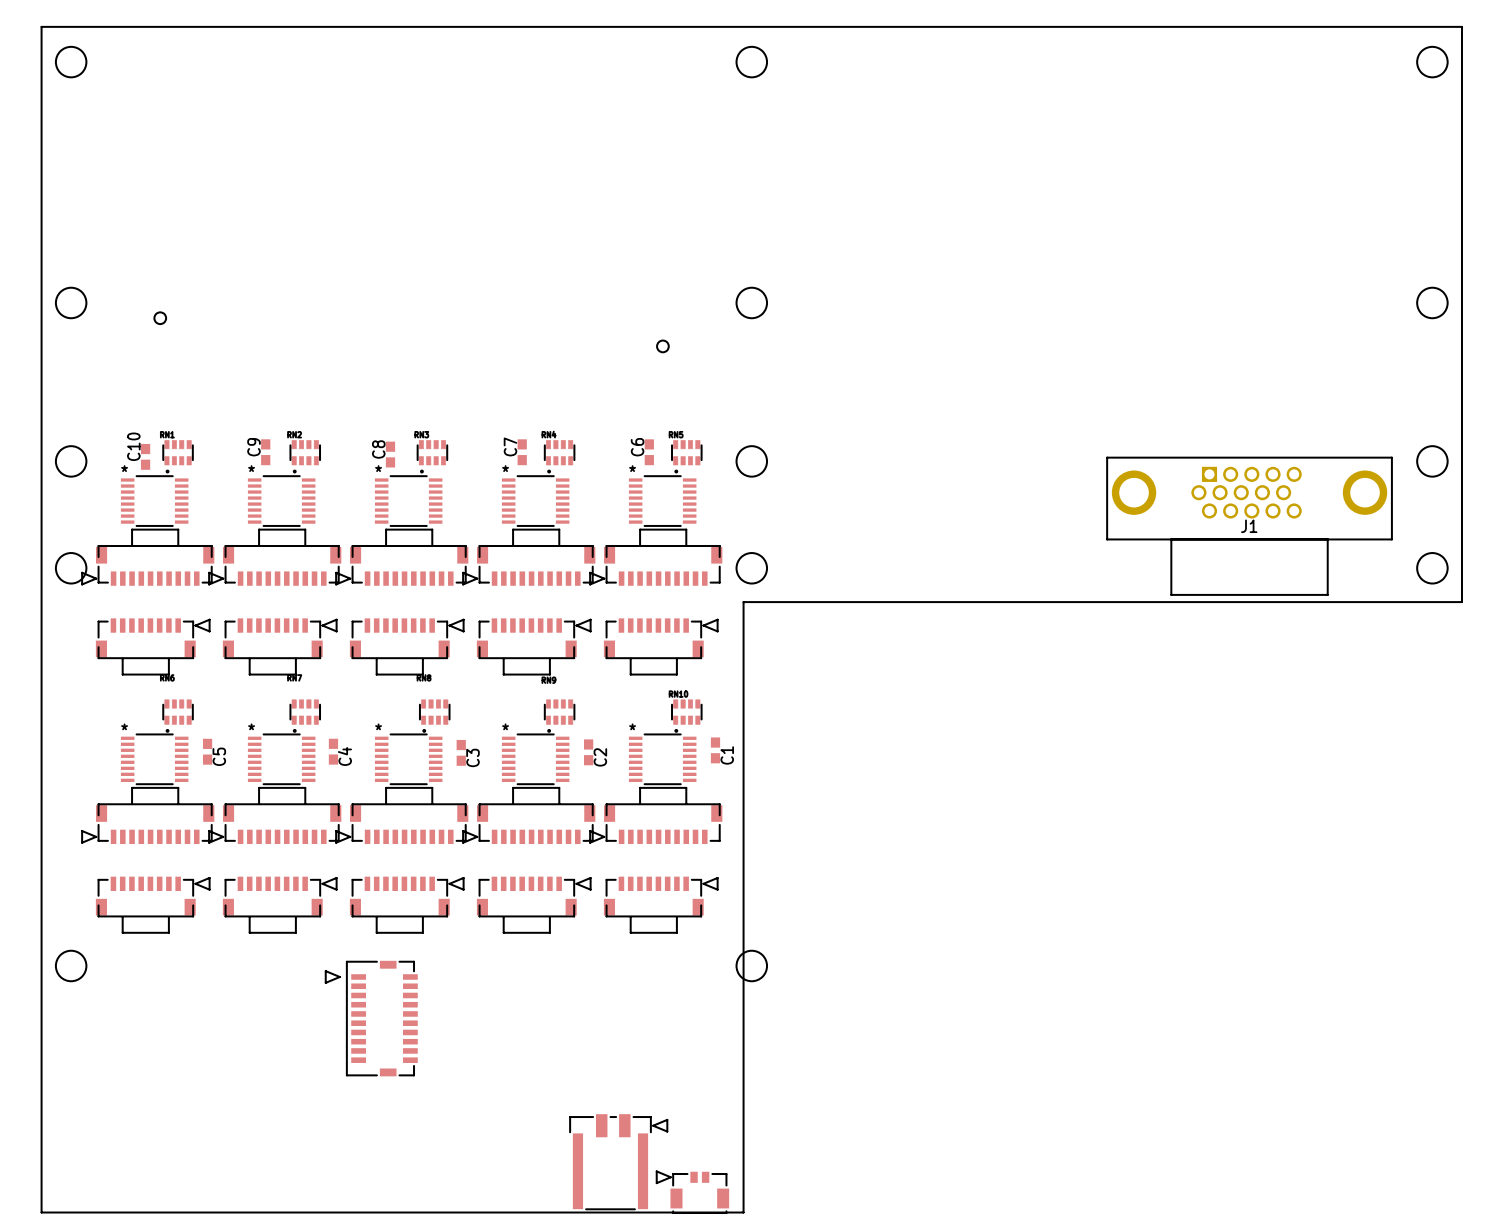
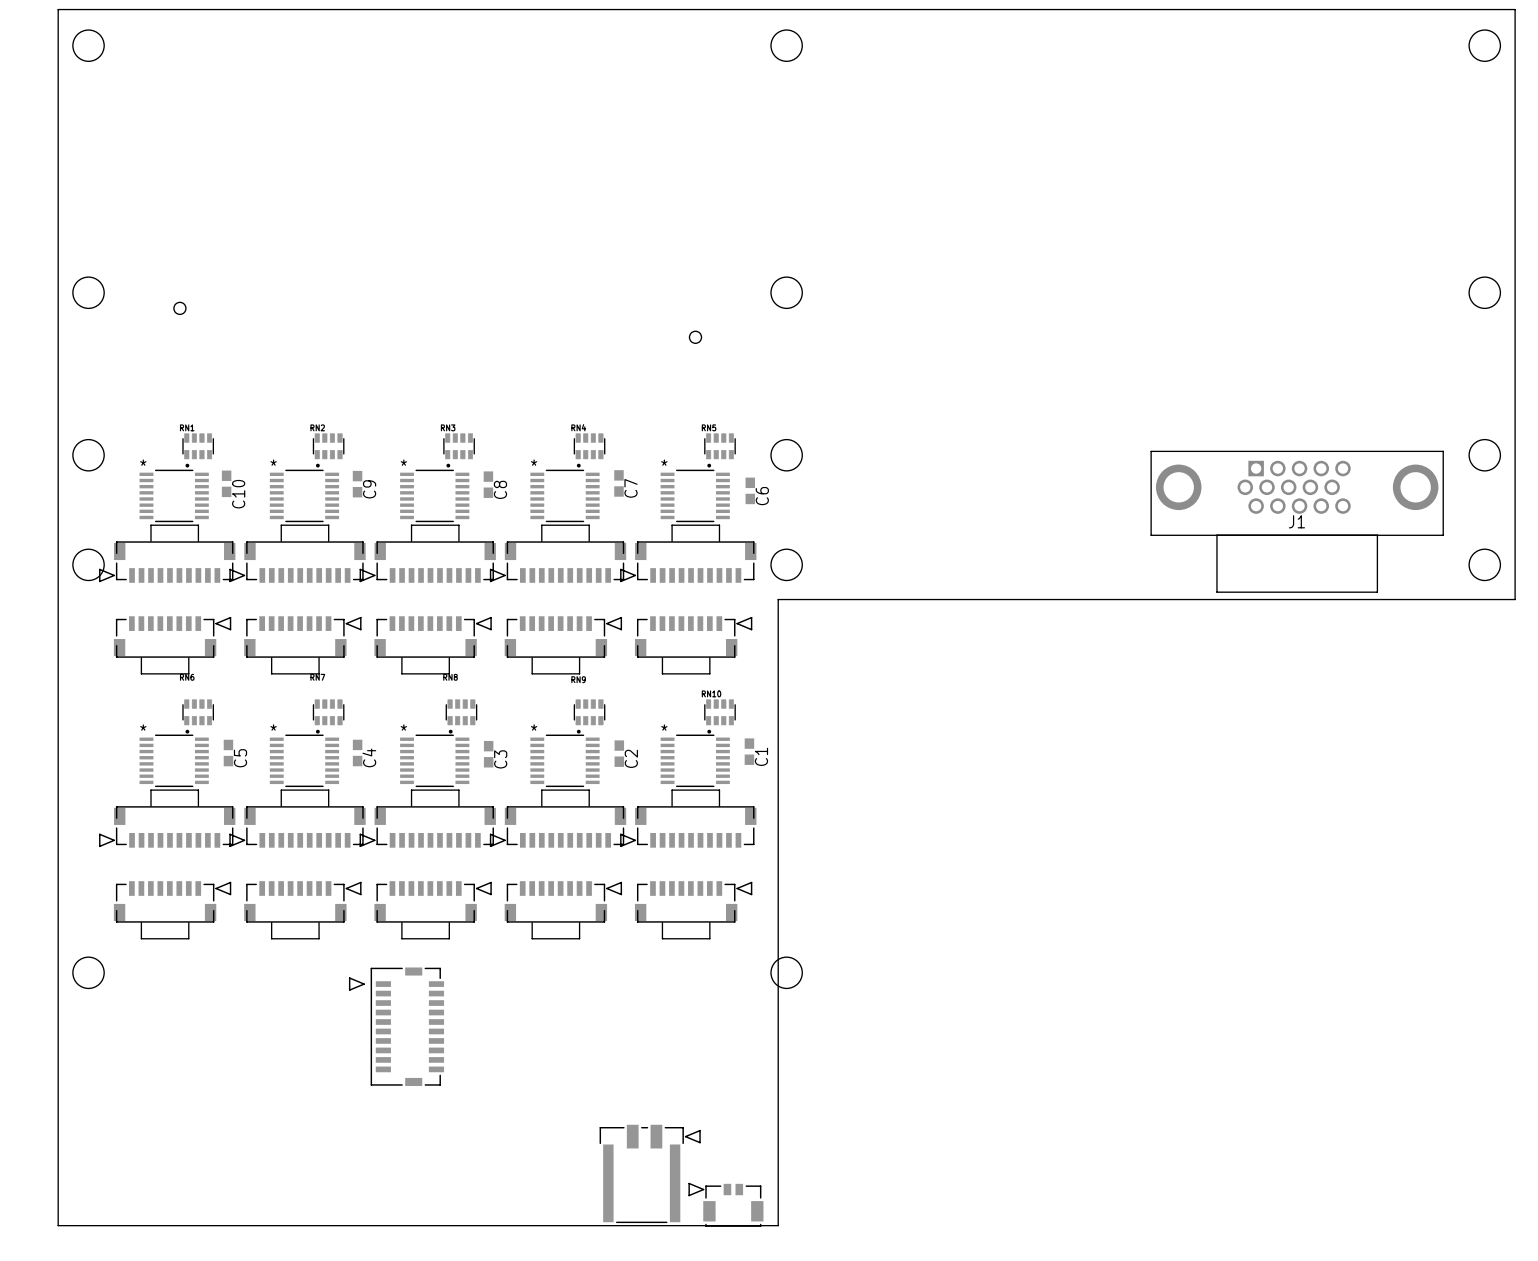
C10 name position: C10 (133, 446) -> C10 (238, 494)
C7 name position: C7 (510, 446) -> C7 (631, 488)
C9 name position: C9 (253, 447) -> C9 (369, 489)
C6 name position: C6 (637, 447) -> C6 (762, 496)
C8 name position: C8 (378, 449) -> C8 (500, 489)
C9 position: (265, 452) -> (357, 484)
C7 position: (522, 452) -> (618, 483)
C6 position: (649, 452) -> (750, 490)
C8 position: (390, 454) -> (488, 484)
C10 position: (145, 456) -> (226, 483)

